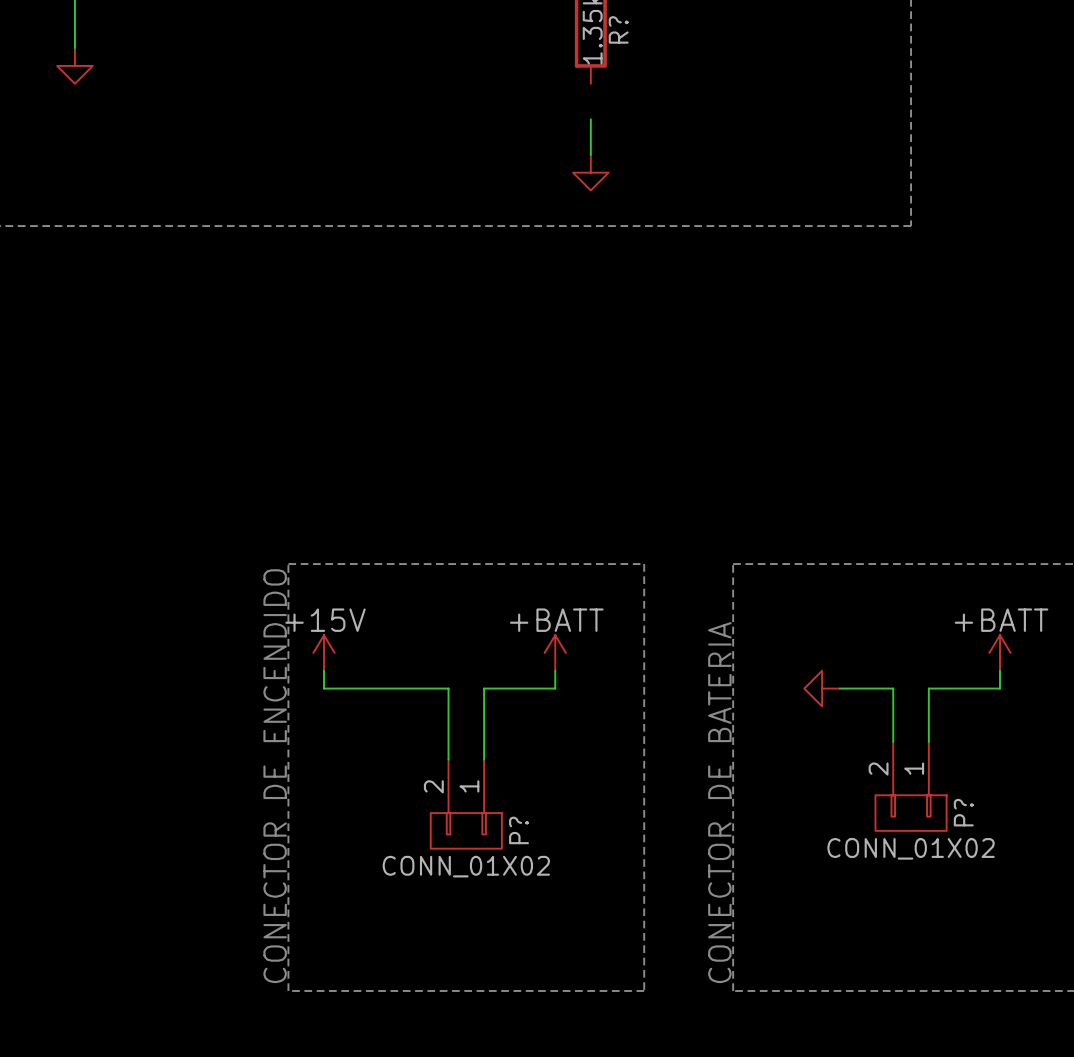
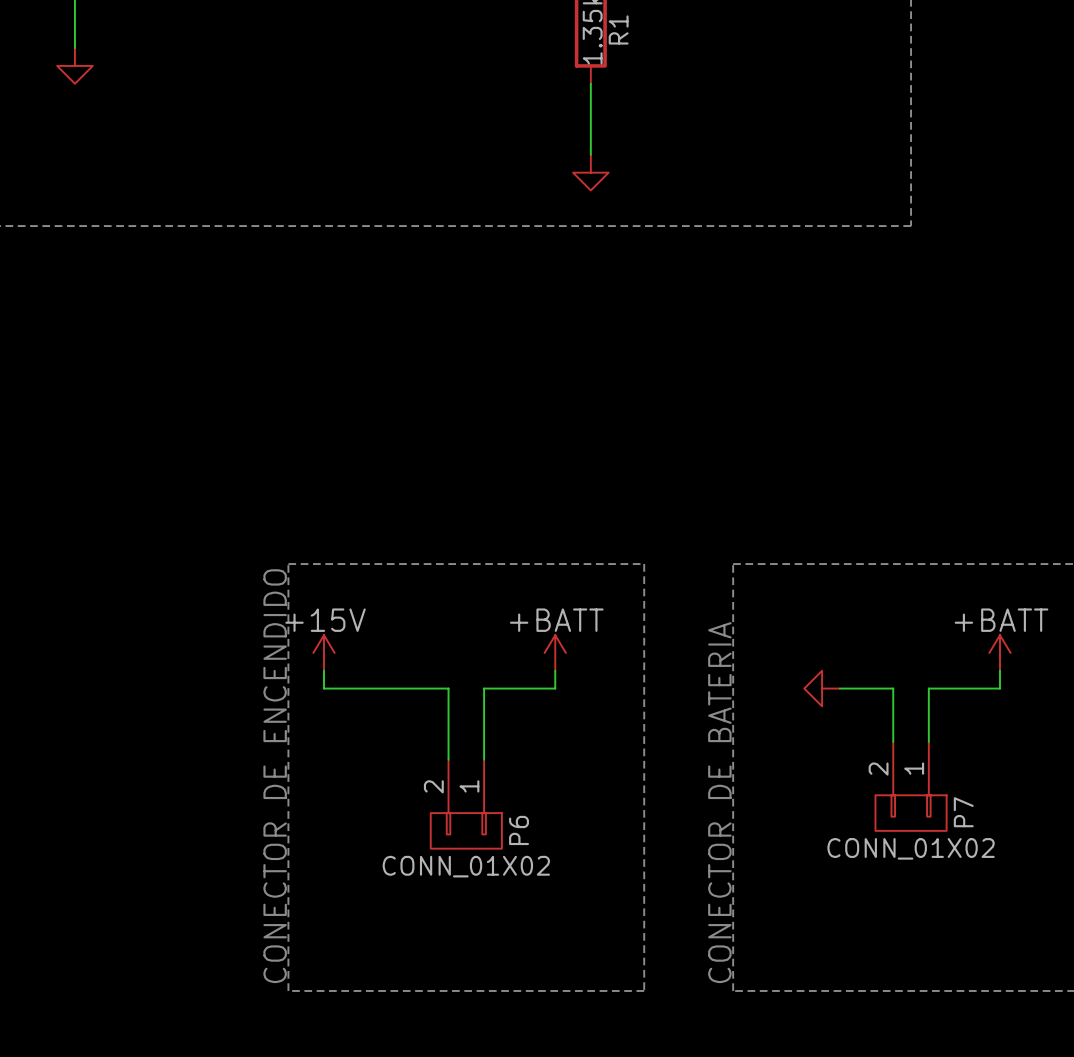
R? name: R? (618, 29) -> R1 (618, 29)
wire: none -> (590, 83) (590, 119)
P? name: P? (963, 812) -> P7 (963, 812)
P? name: P? (519, 830) -> P6 (519, 830)

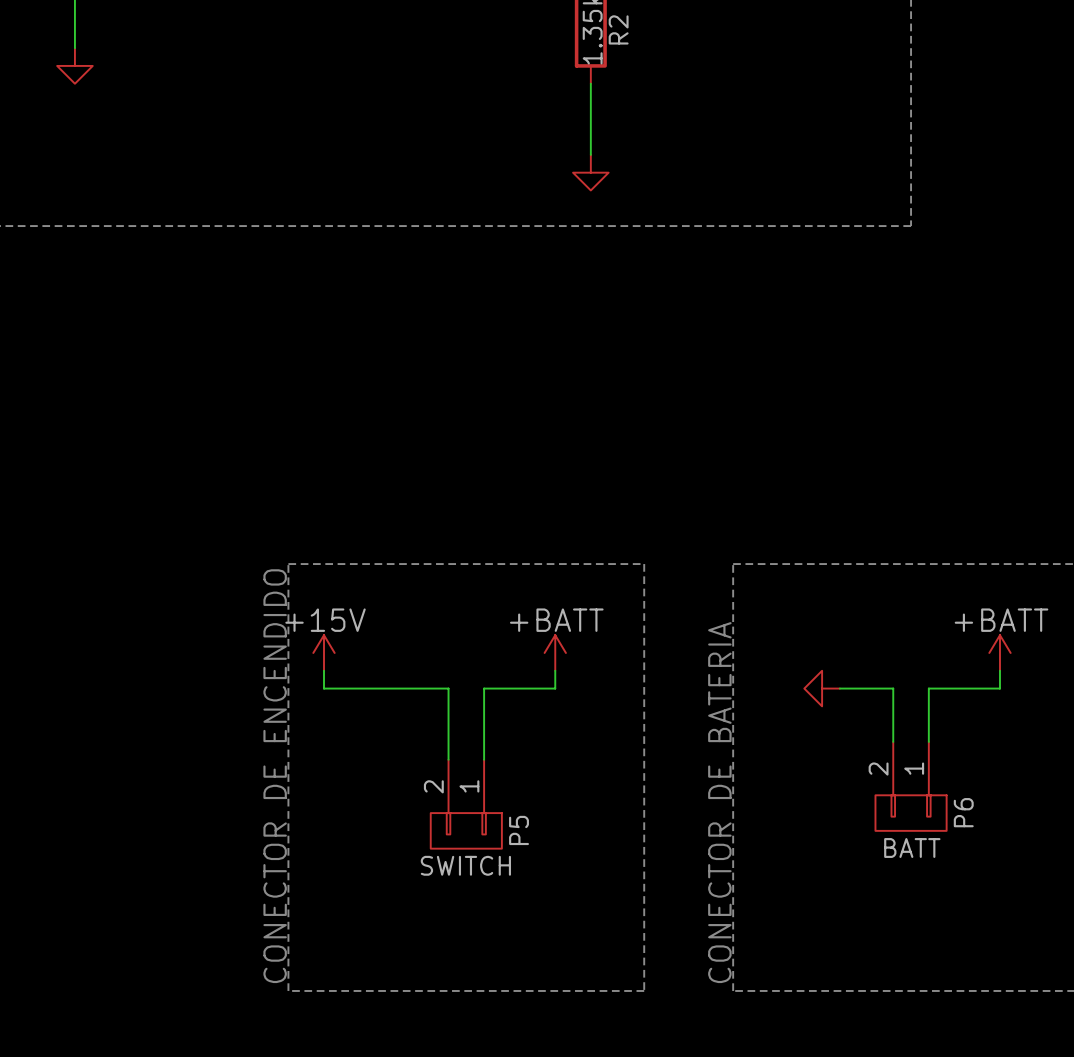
R1 name: R1 (618, 29) -> R2 (618, 29)
P7 name: P7 (963, 812) -> P6 (963, 812)
P6 name: P6 (519, 830) -> P5 (519, 830)
P7 value: CONN_01X02 (911, 848) -> BATT (912, 848)
P6 value: CONN_01X02 (466, 866) -> SWITCH (465, 865)

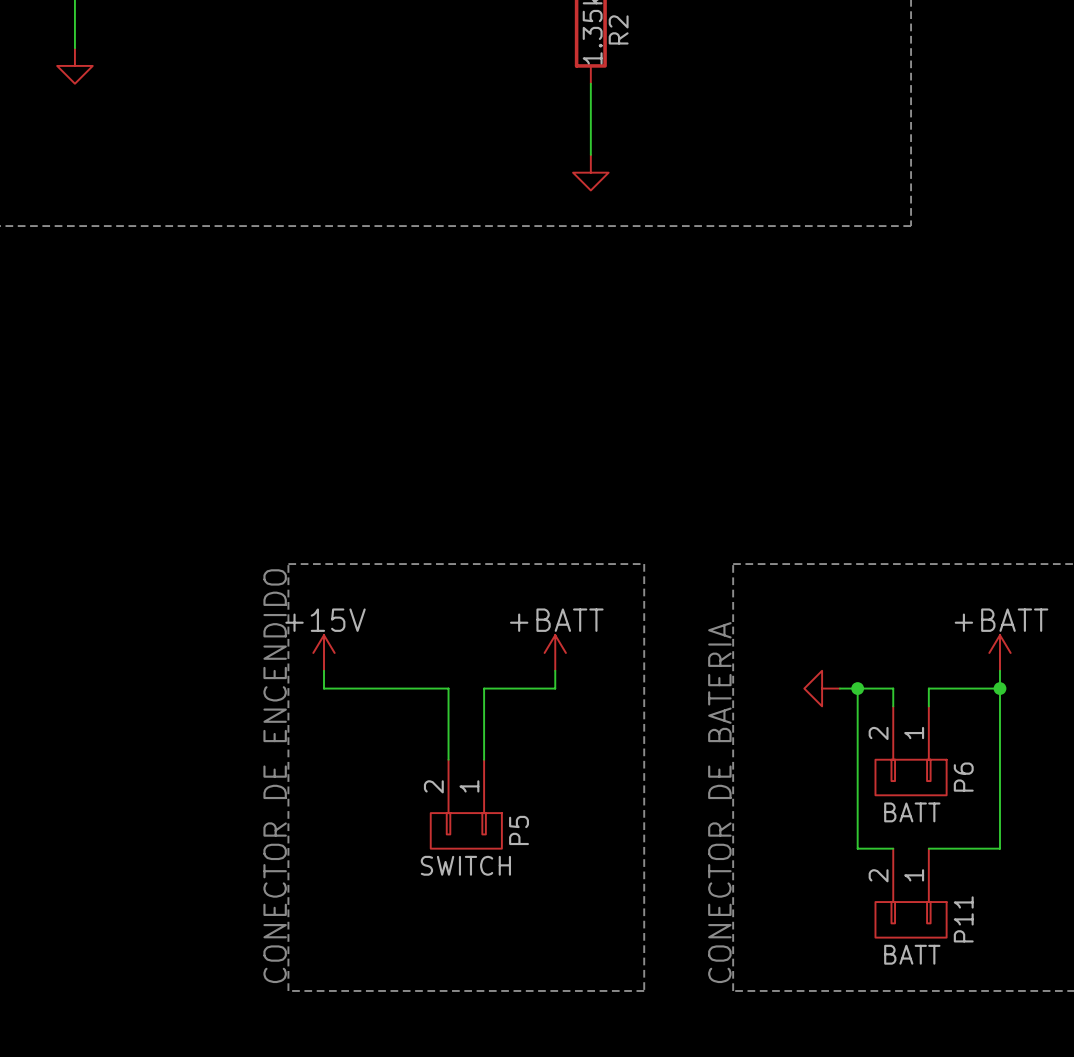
wire: none -> (857, 688) (857, 848) (893, 848)
junction: none -> (857, 688)
wire: none -> (999, 688) (999, 848) (928, 848)
junction: none -> (999, 688)
P6 position: (911, 786) -> (911, 750)
P11: none -> BATT (911, 893)

